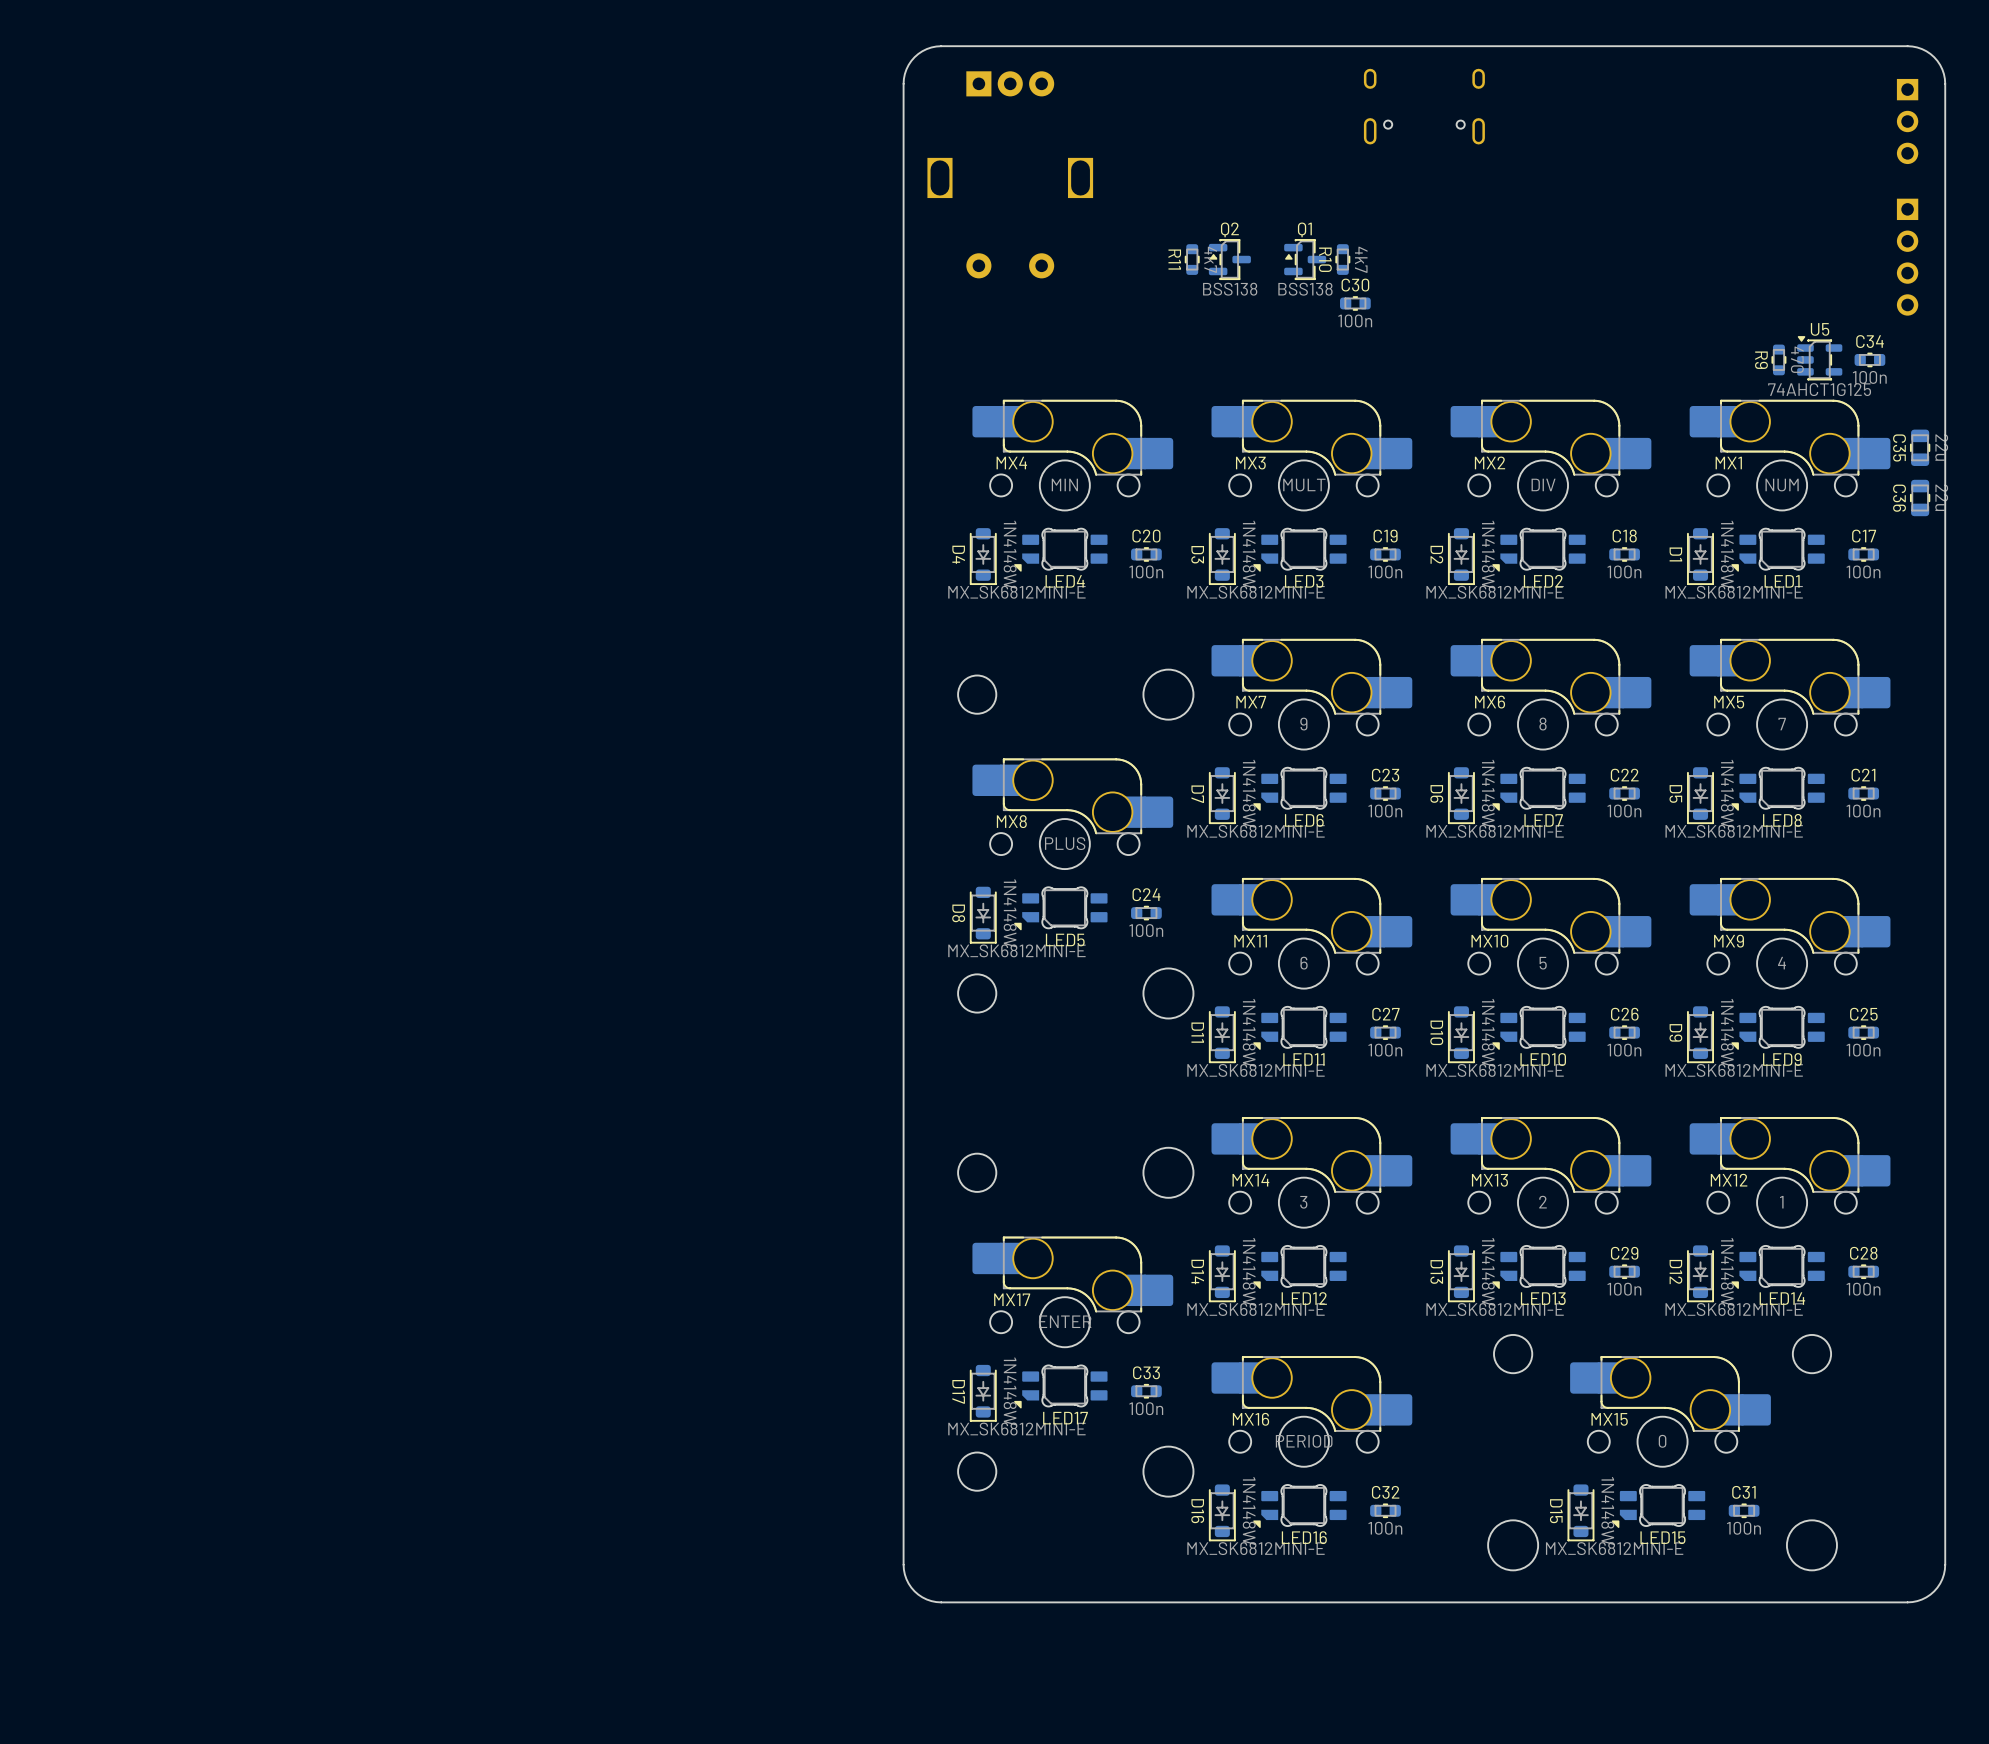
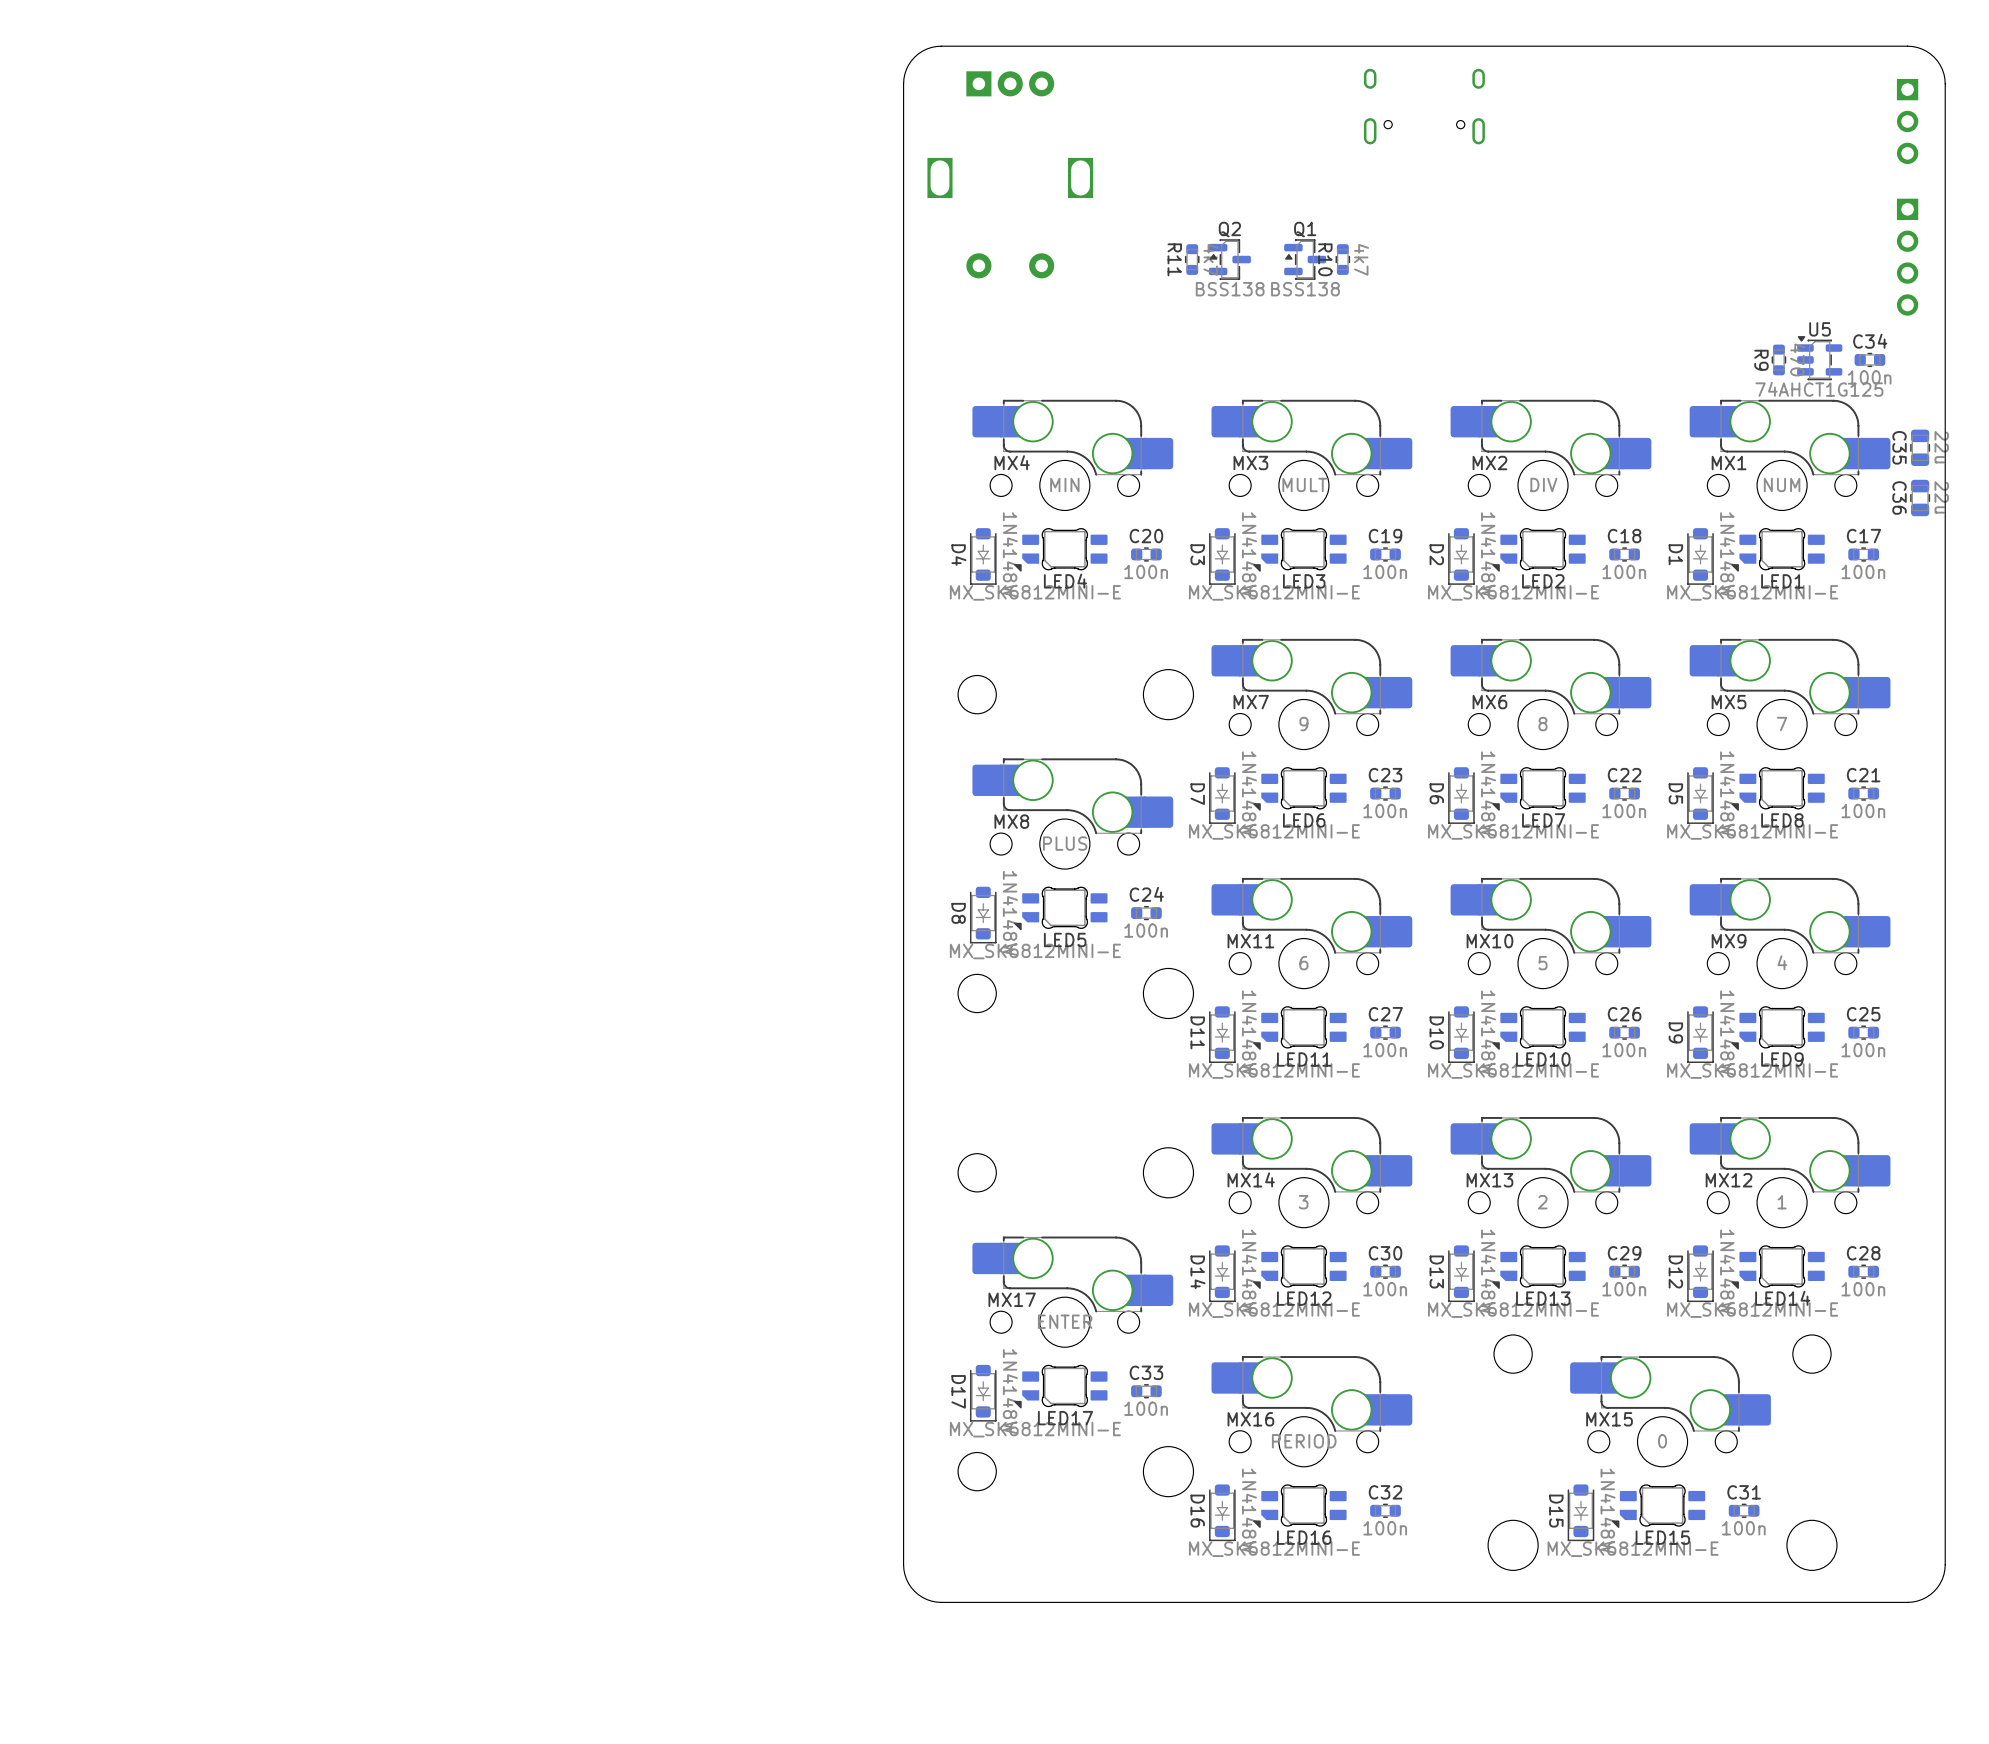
C30 position: (1355, 303) -> (1385, 1271)

